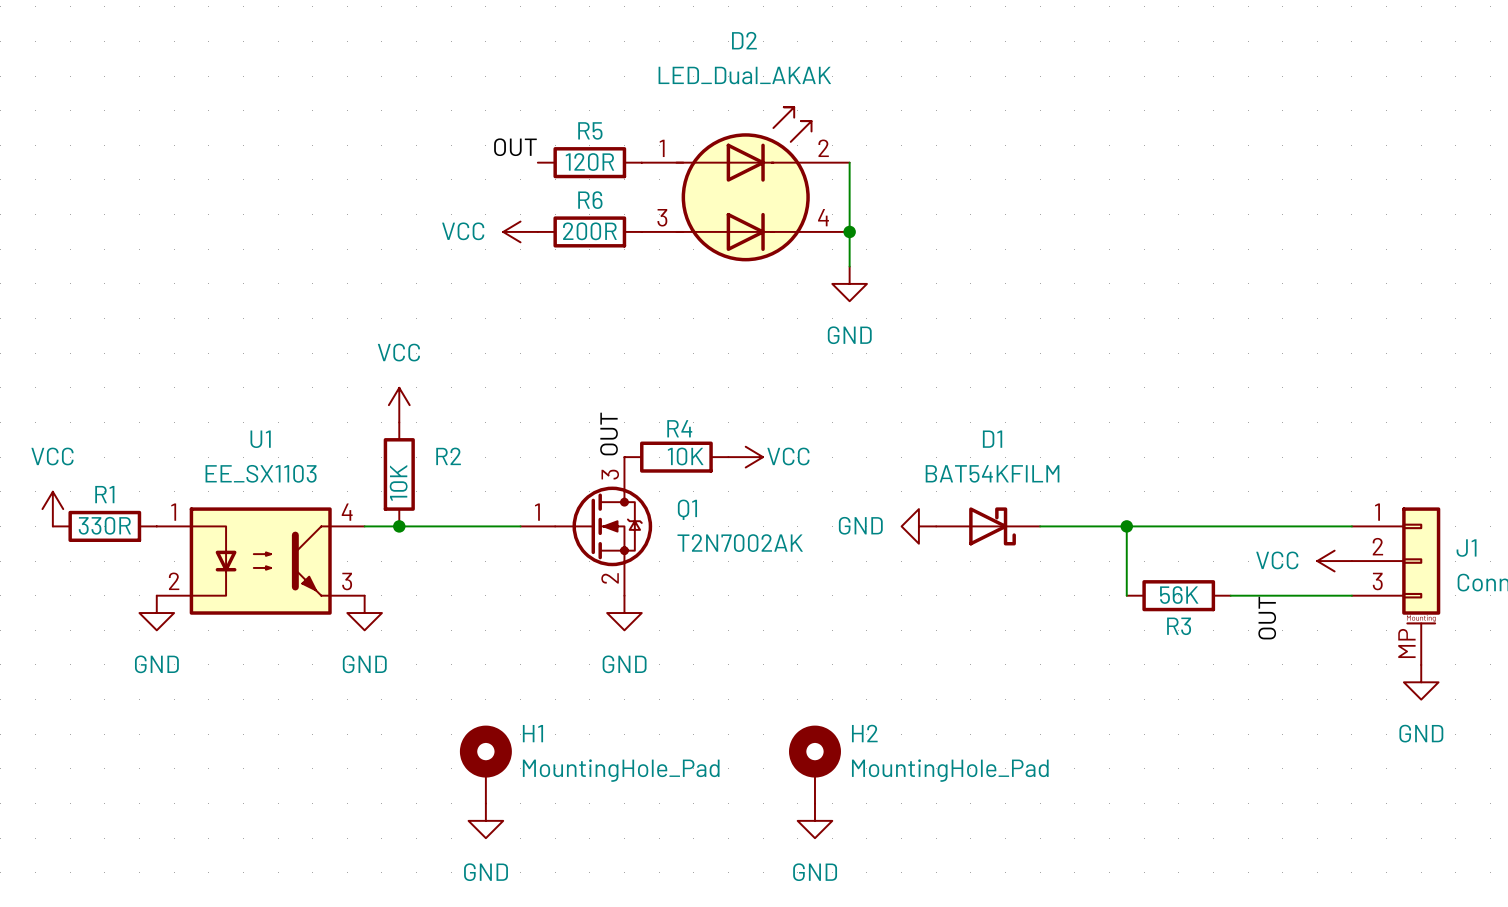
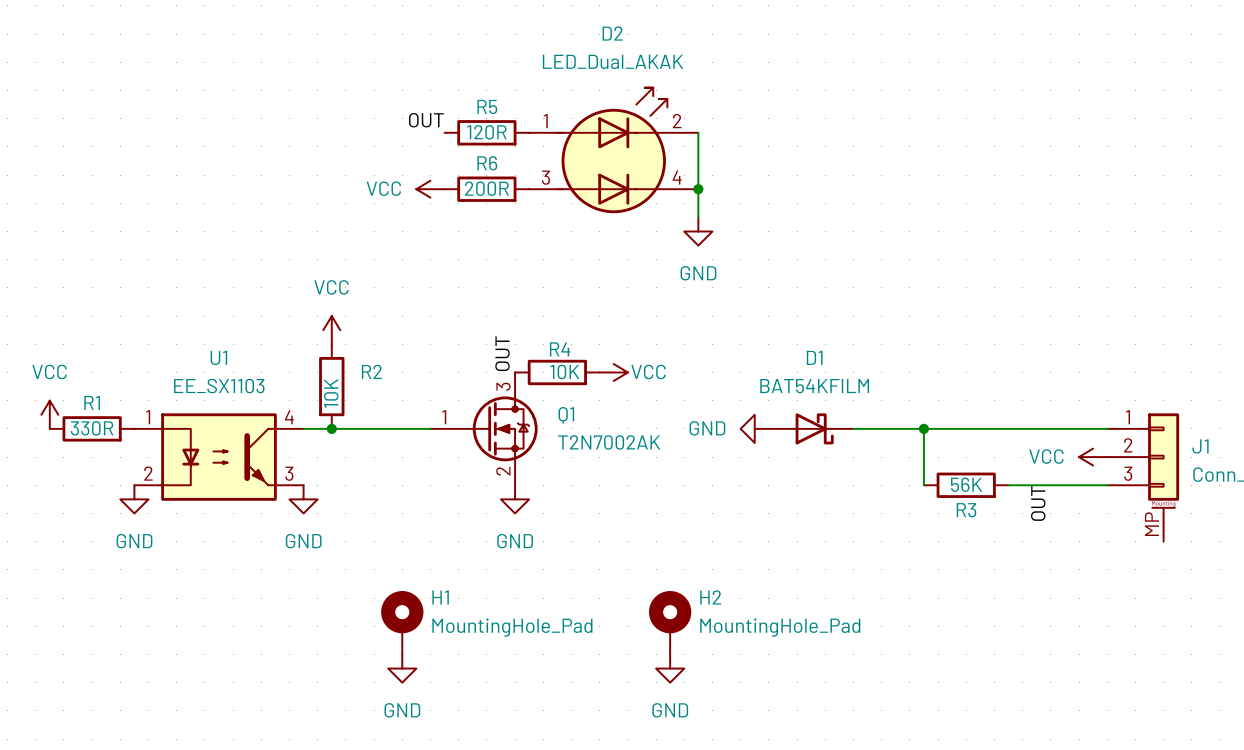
power symbol: GND (1421, 682) -> none

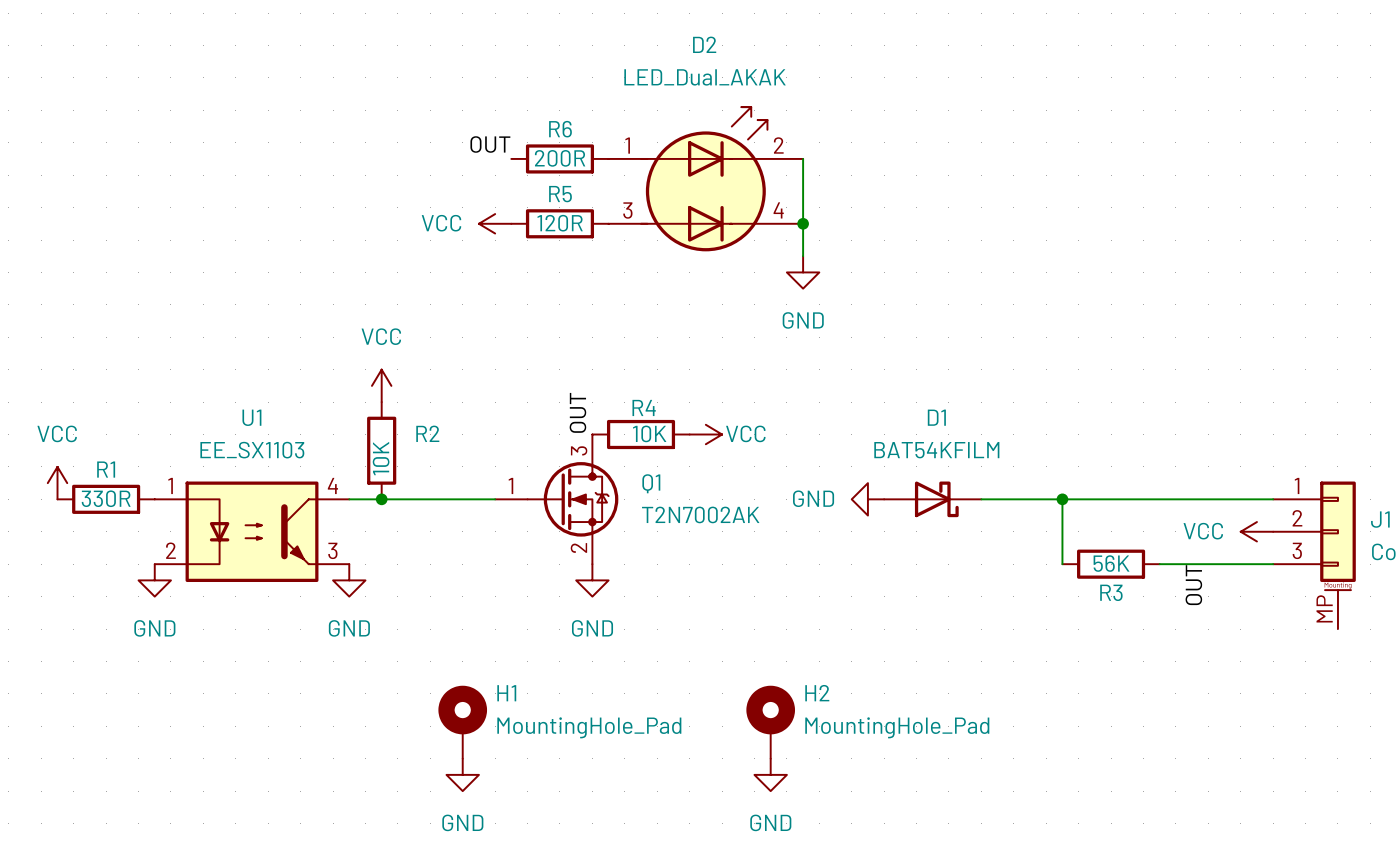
R5 name: R5 (487, 106) -> R6 (560, 129)
R5 value: 120R (486, 132) -> 200R (560, 158)
R6 name: R6 (487, 163) -> R5 (560, 194)
R6 value: 200R (486, 188) -> 120R (560, 223)

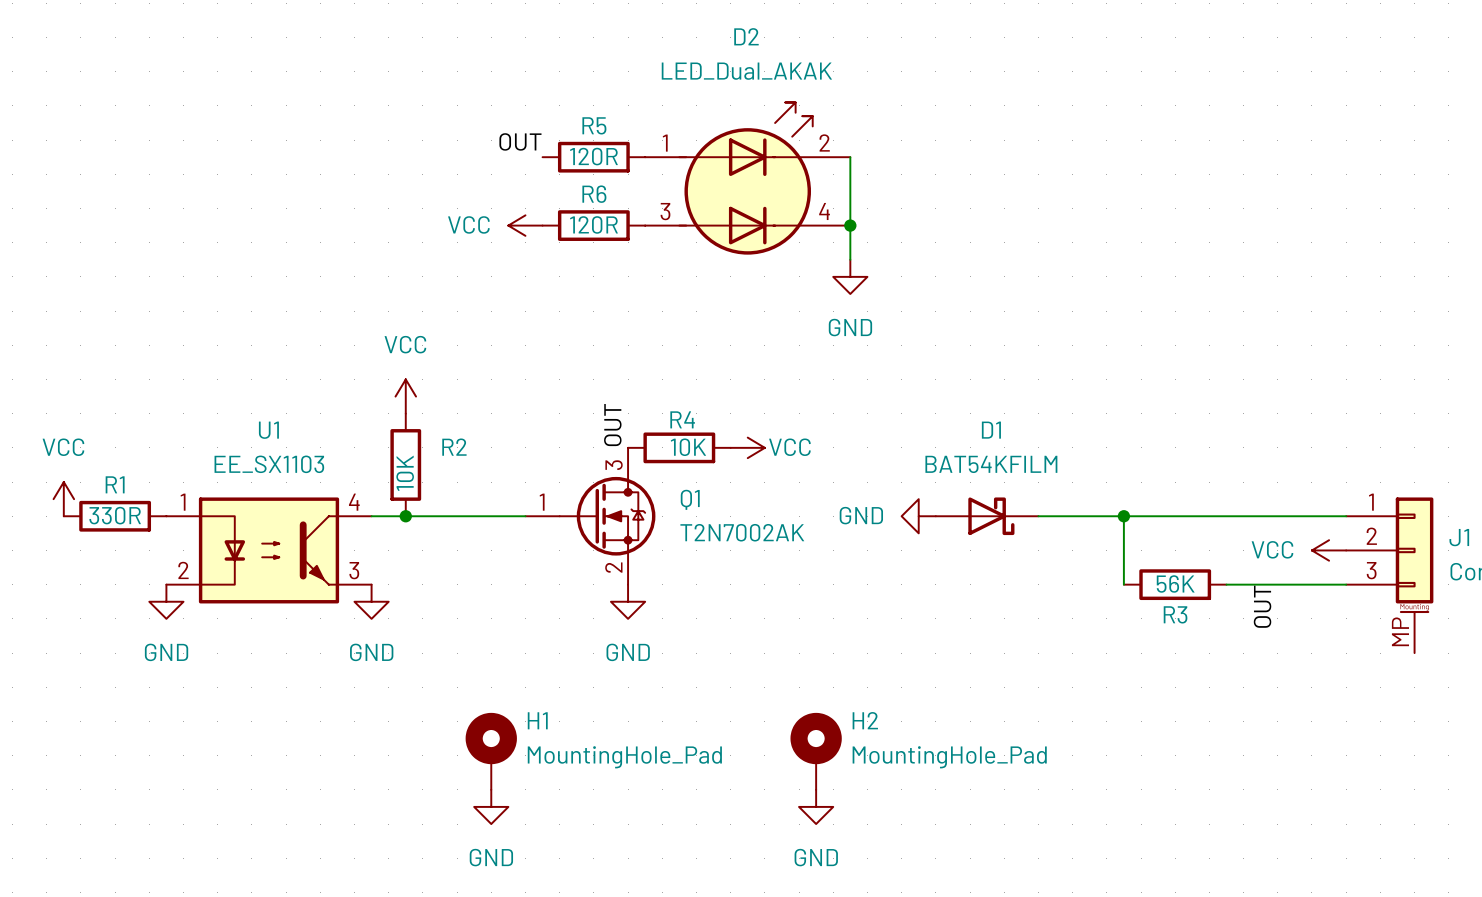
R6 name: R6 (560, 129) -> R5 (594, 125)
R6 value: 200R (560, 158) -> 120R (593, 156)
R5 name: R5 (560, 194) -> R6 (594, 194)

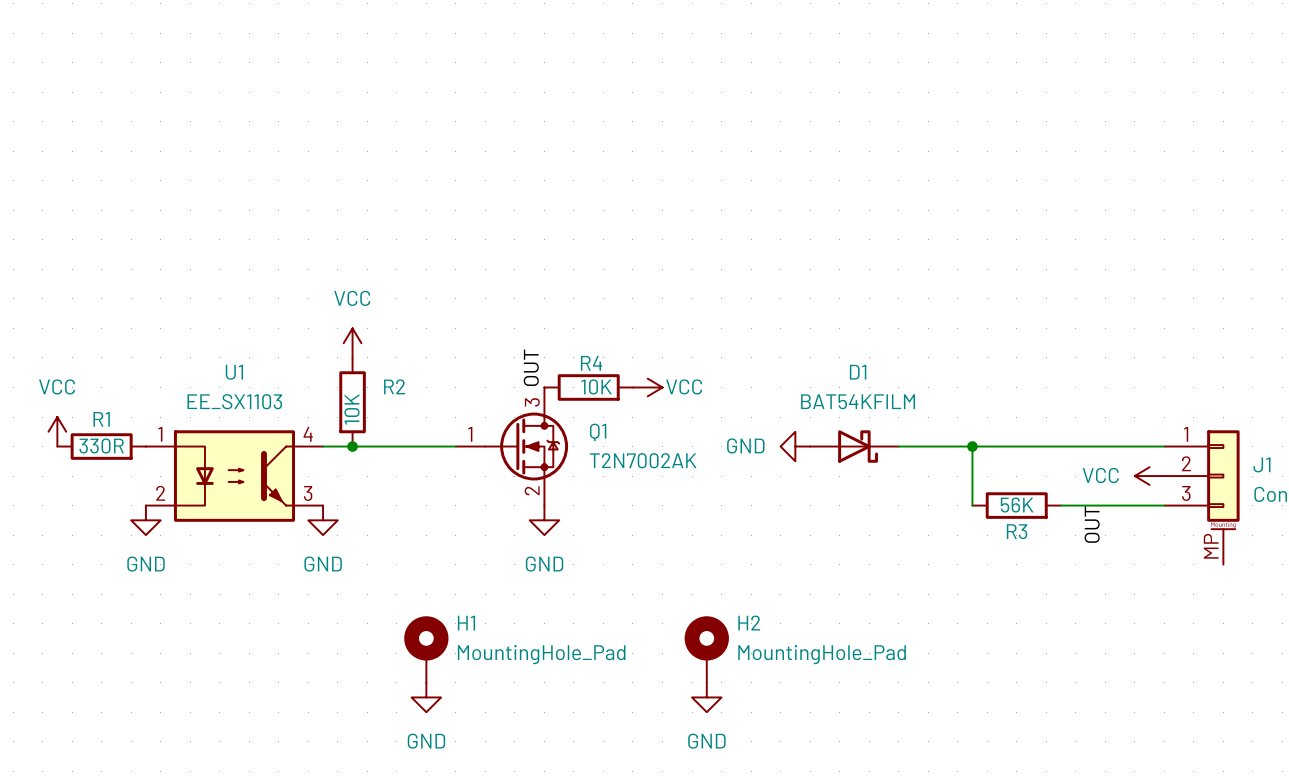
label: OUT (520, 141) -> none
R5: 120R (593, 157) -> none
wire: (850, 157) (850, 259) -> none
D2: LED_Dual_AKAK (747, 178) -> none
power symbol: VCC (525, 225) -> none
R6: 120R (593, 225) -> none
junction: (850, 225) -> none
power symbol: GND (850, 276) -> none

